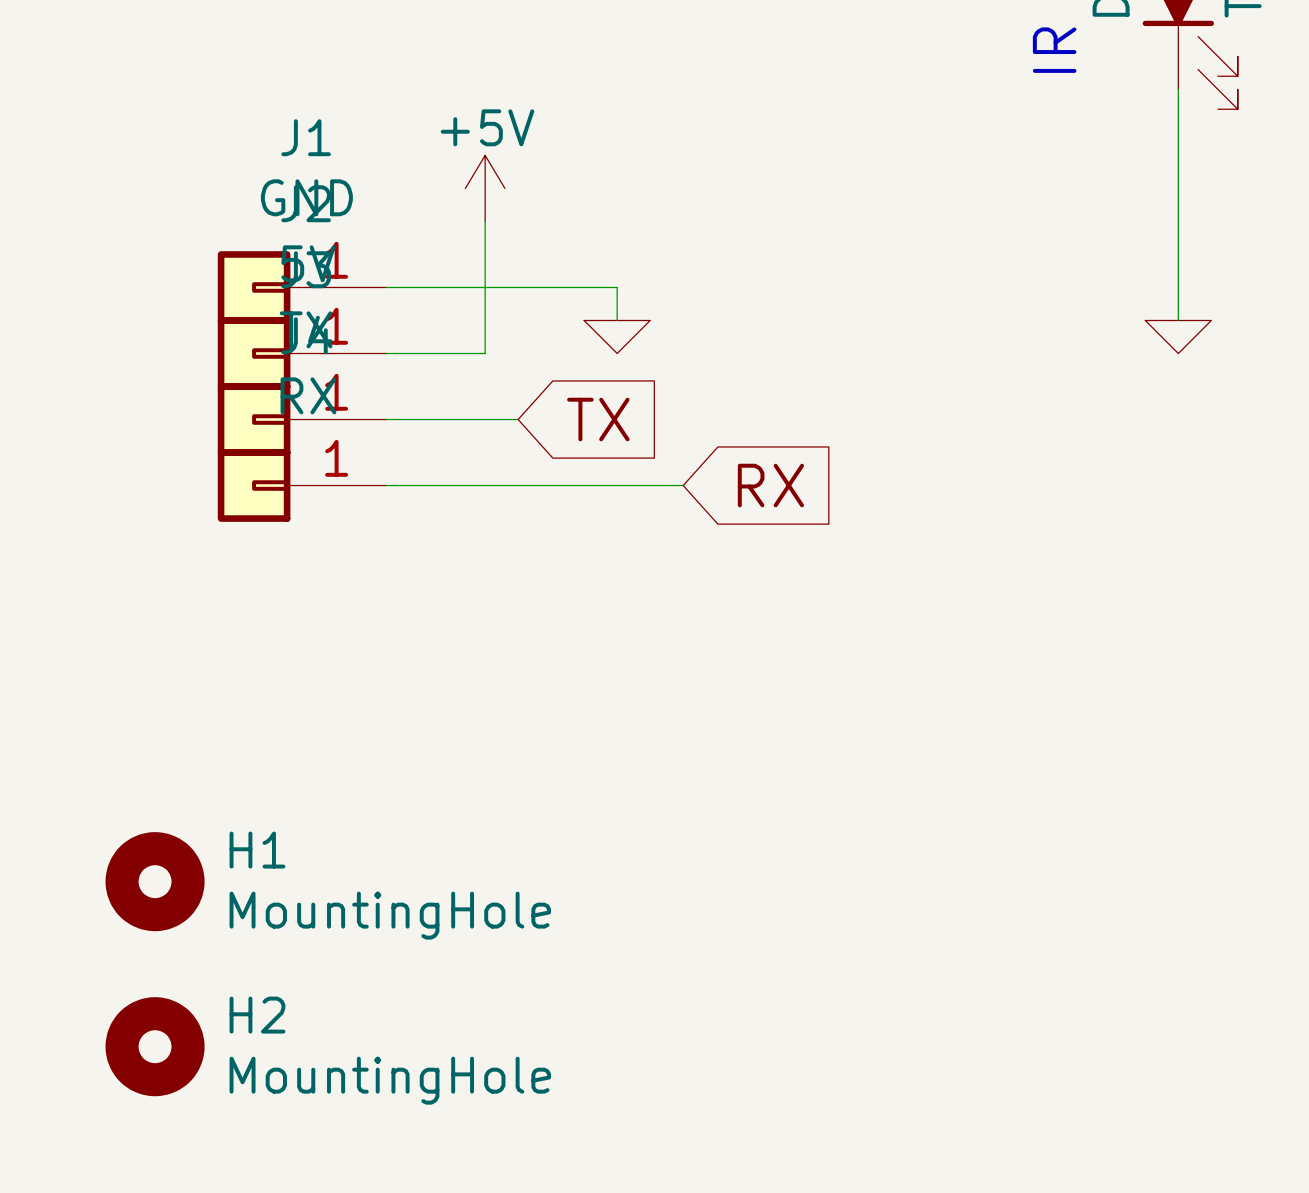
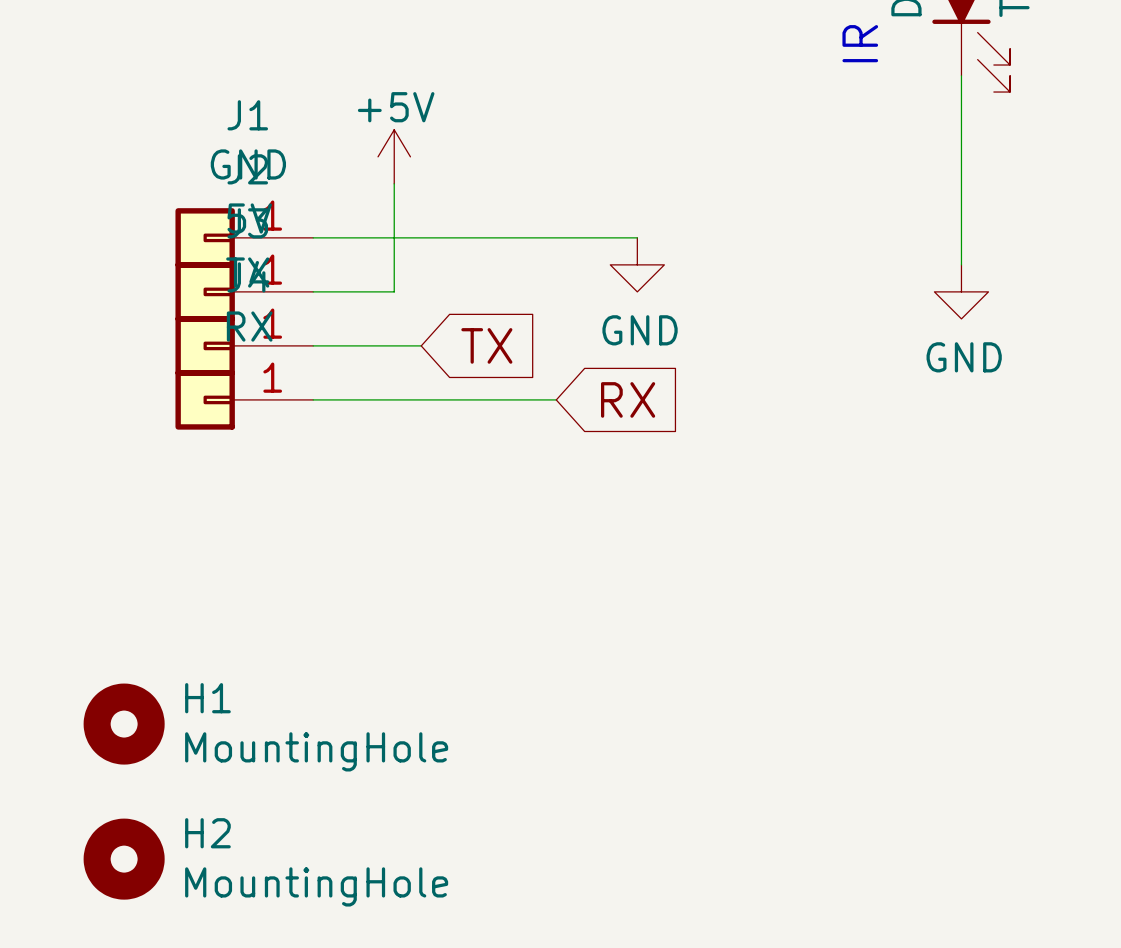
wire: (617, 287) (617, 320) -> (502, 237) (637, 237)
power symbol: none -> GND (637, 264)
power symbol shape: [1145, 320, 1212, 354] -> [934, 264, 989, 319]
power symbol: (617, 337) -> none
power symbol text: none -> GND (964, 357)

